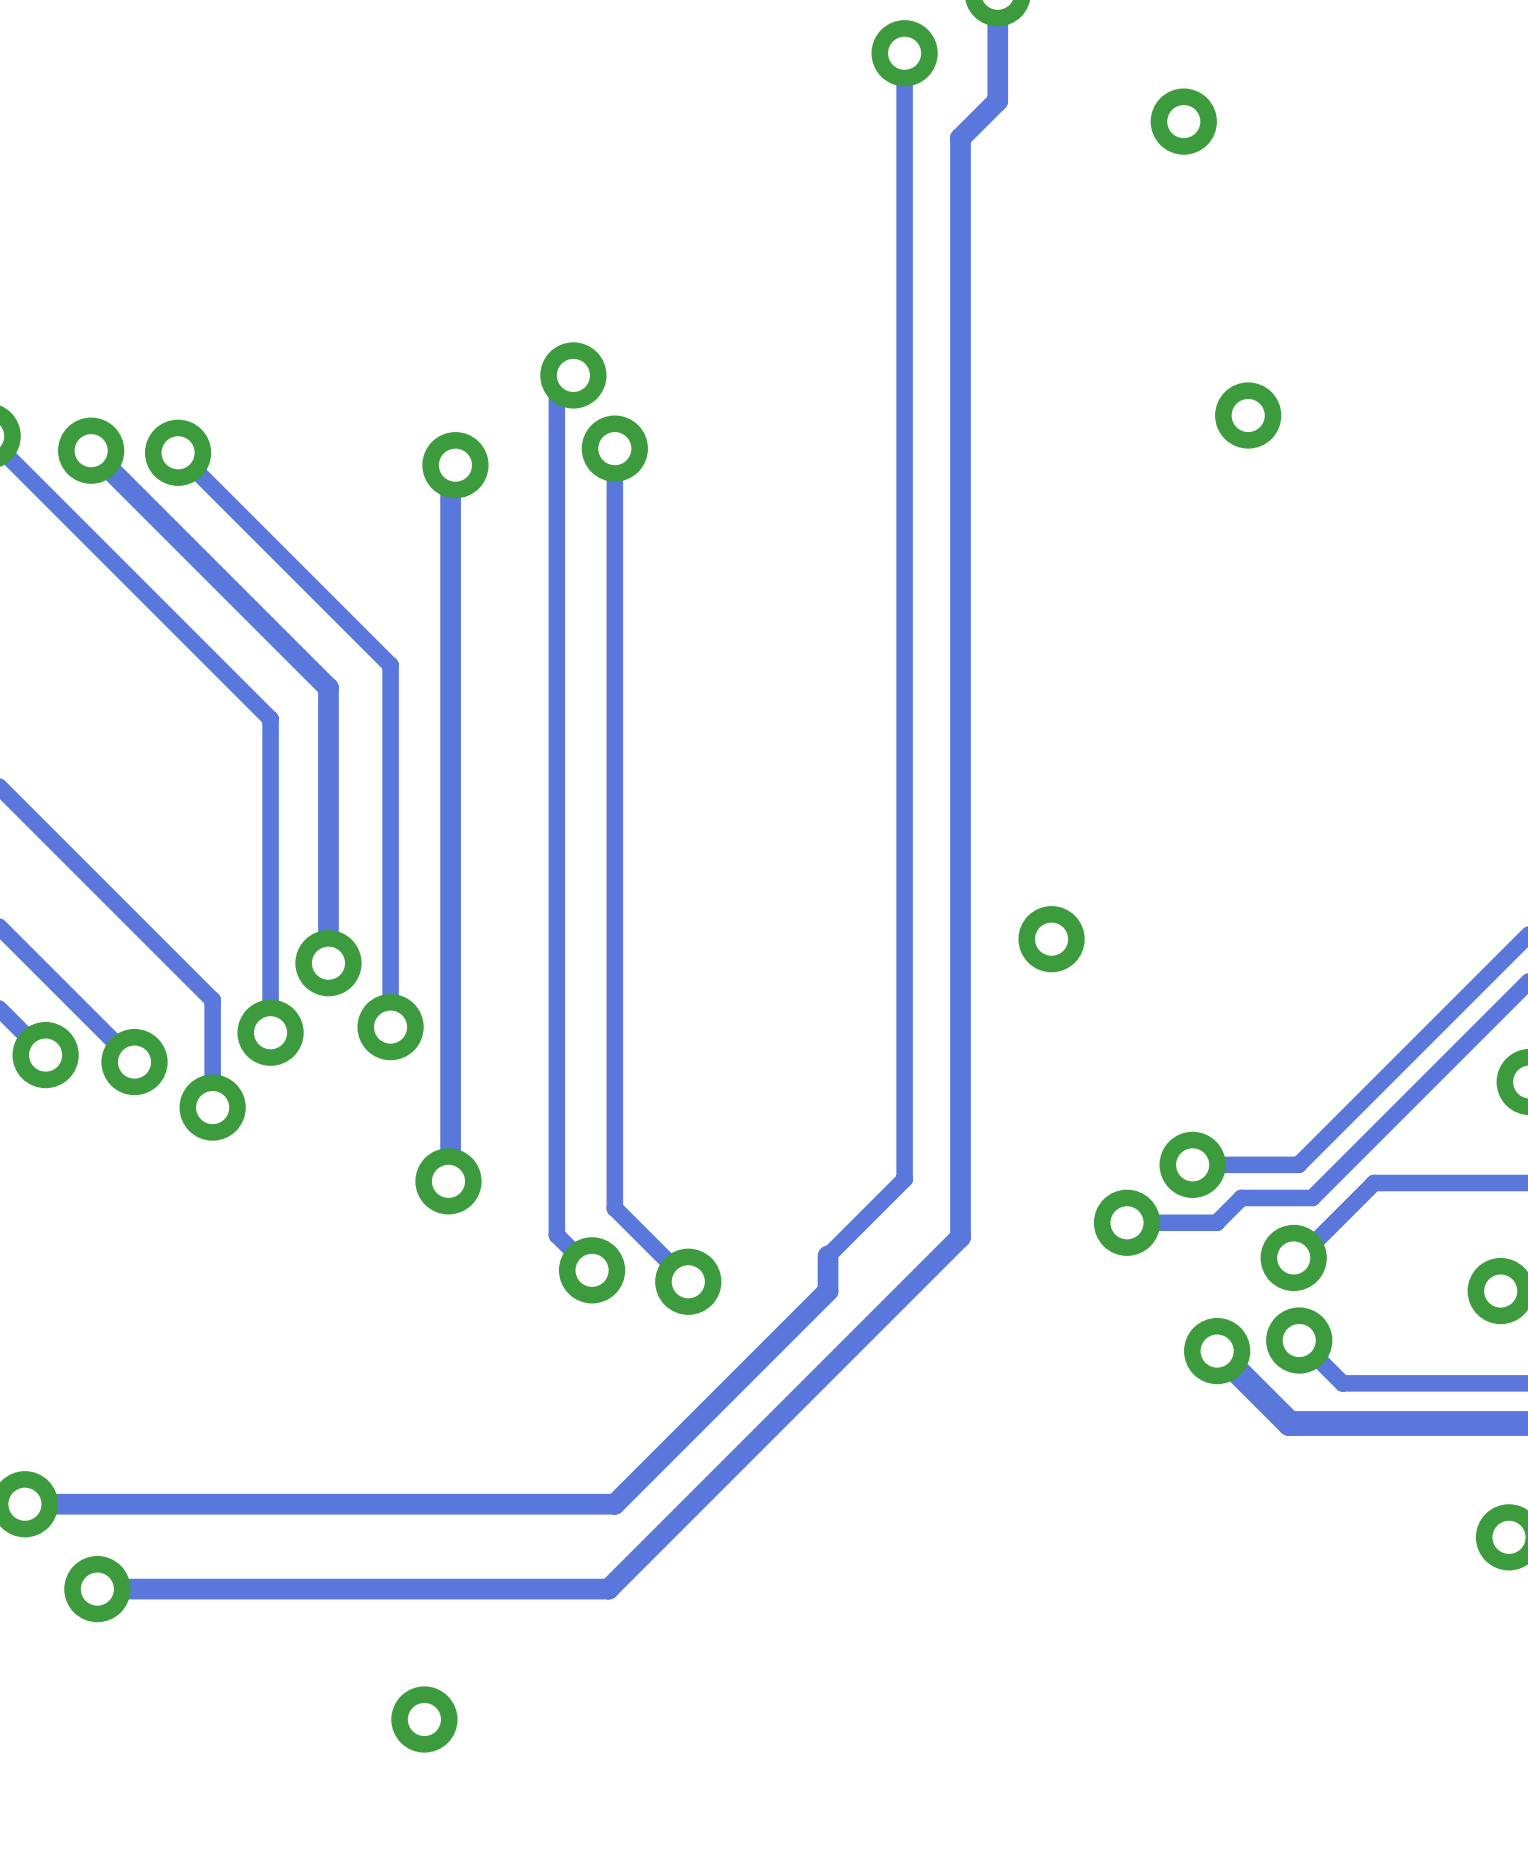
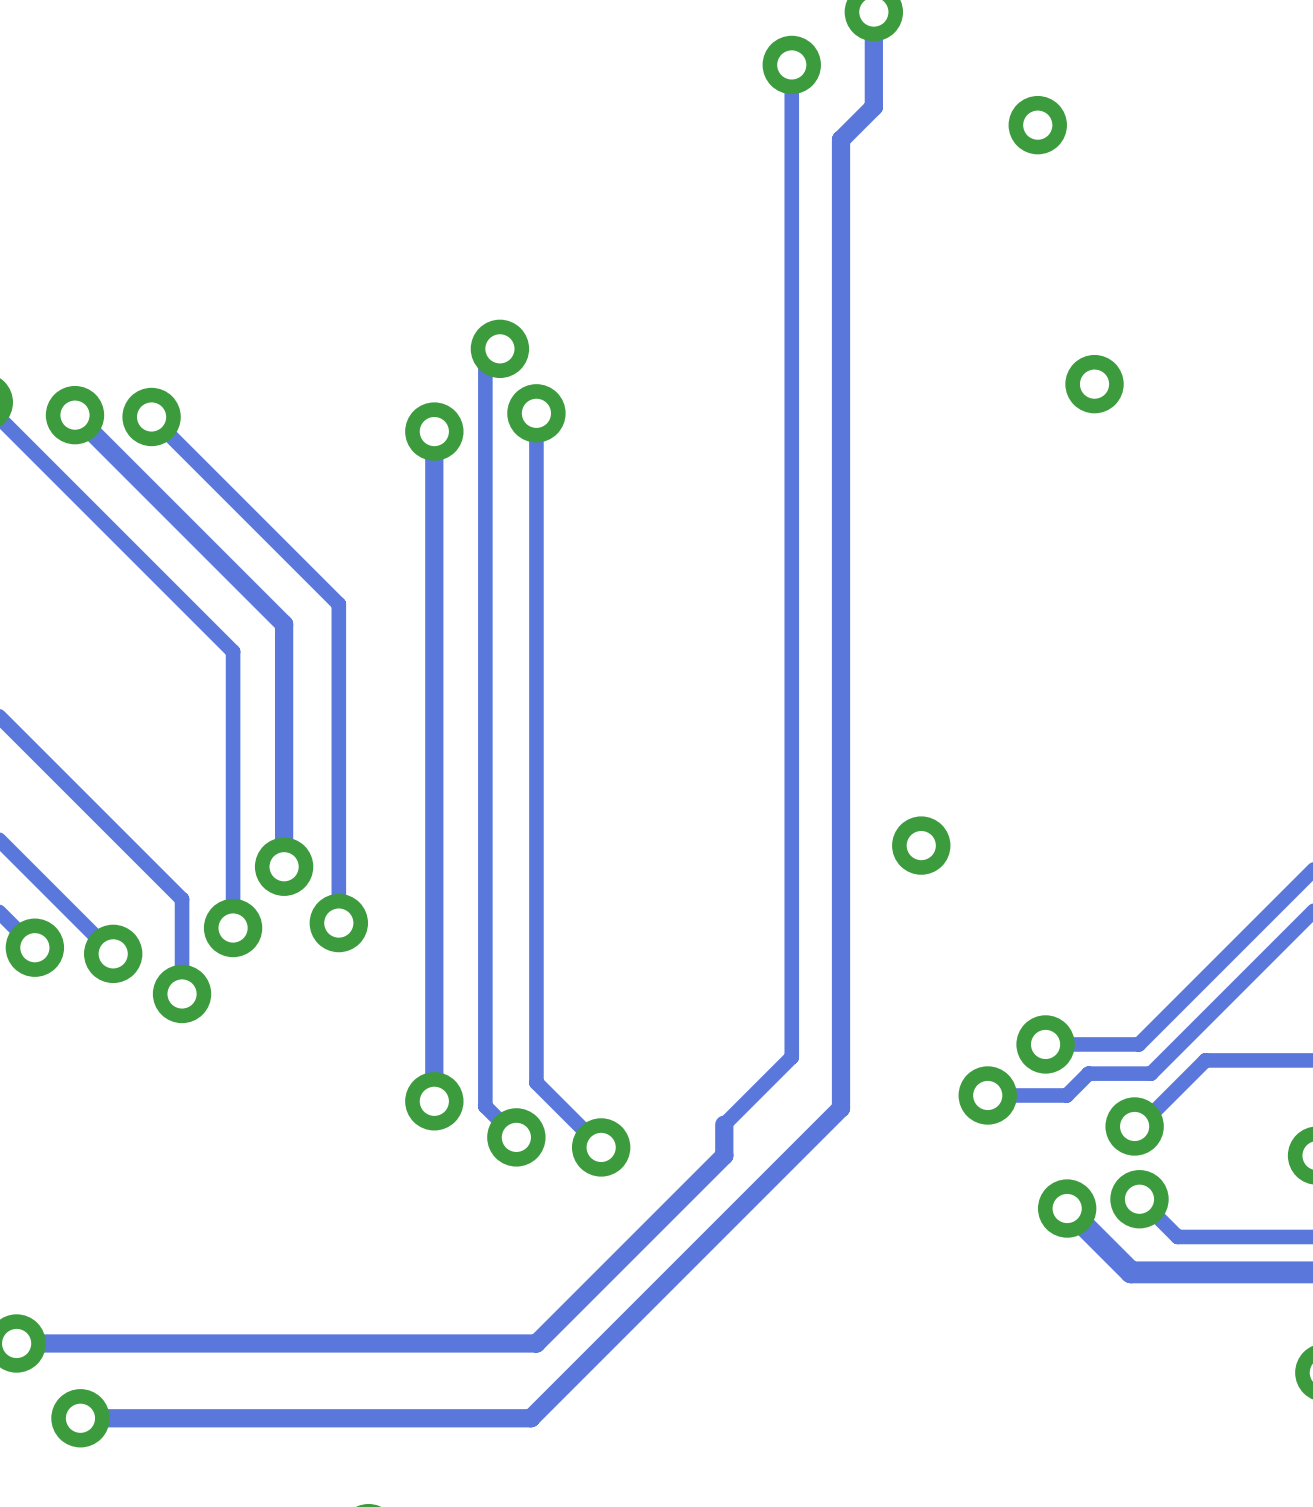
track: (455, 465) (450, 470) (450, 1179) (448, 1181) -> none
via position: (455, 465) -> (434, 431)
track: none -> (434, 431) (434, 1101)
via position: (448, 1181) -> (434, 1101)

